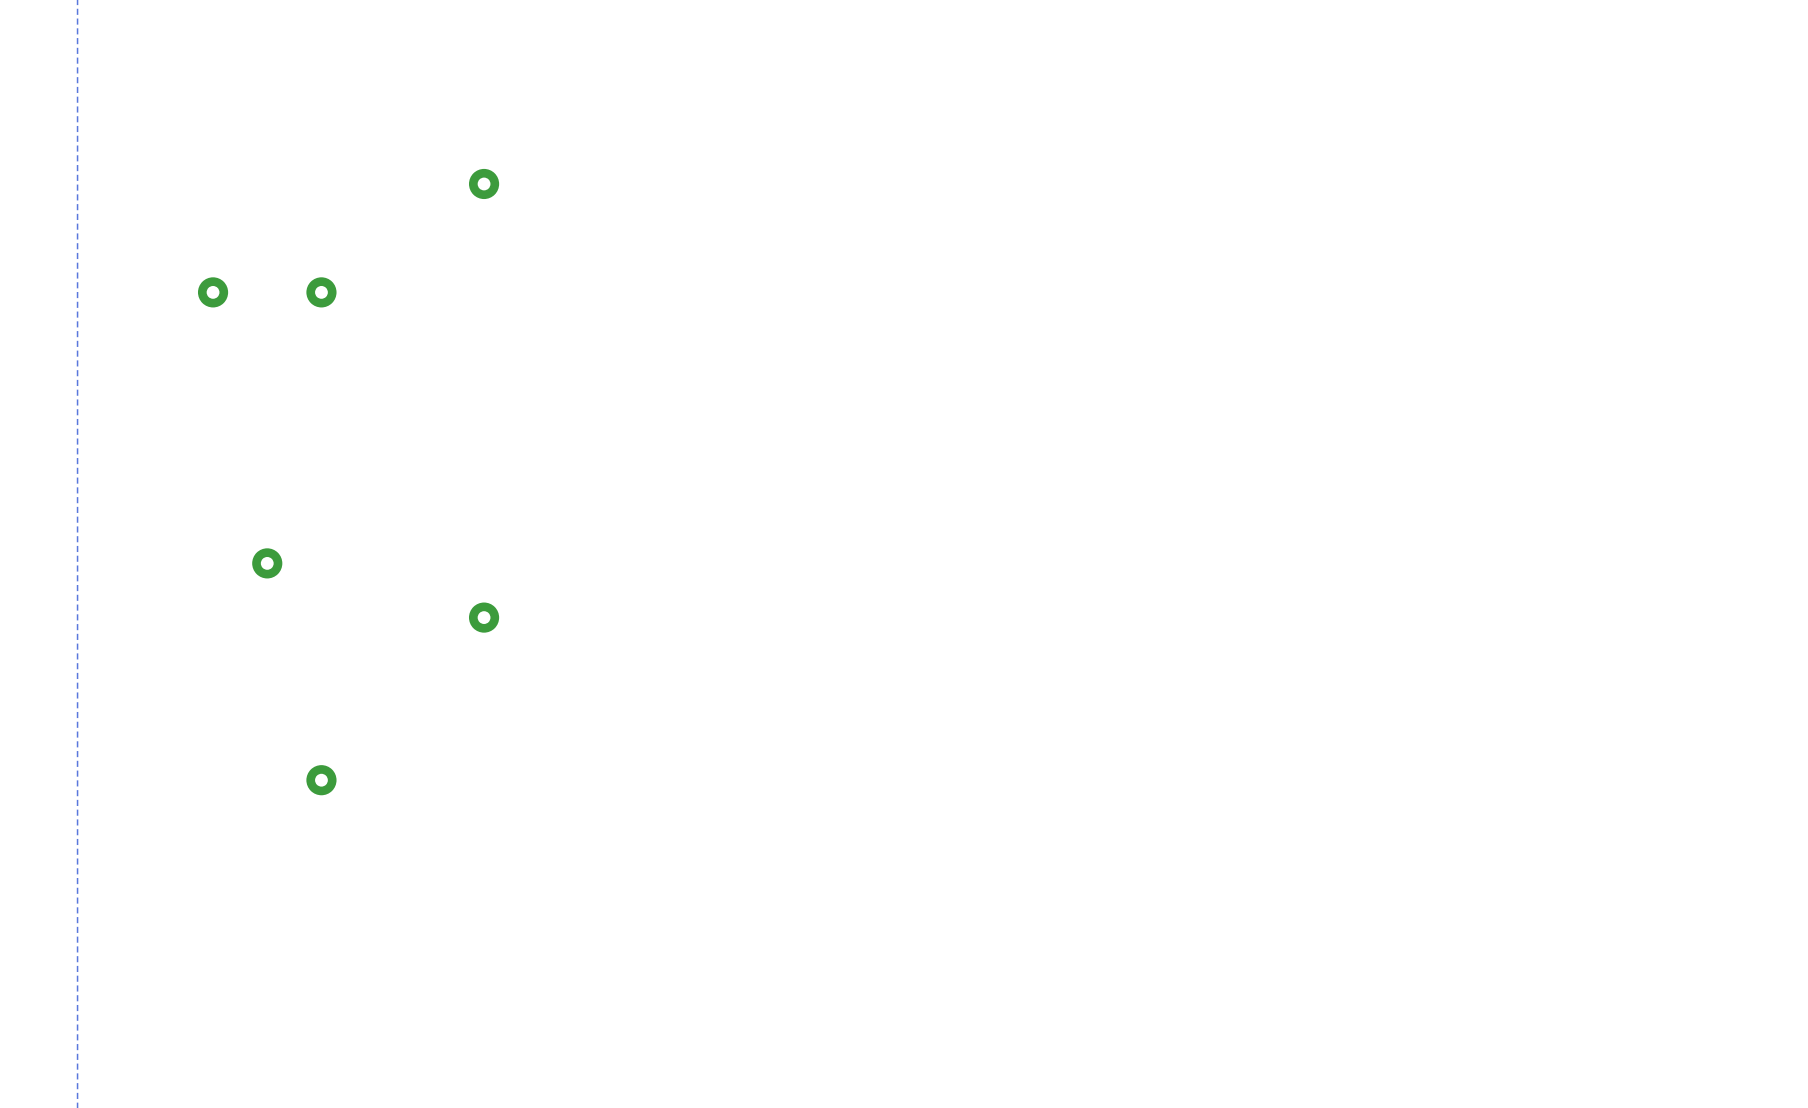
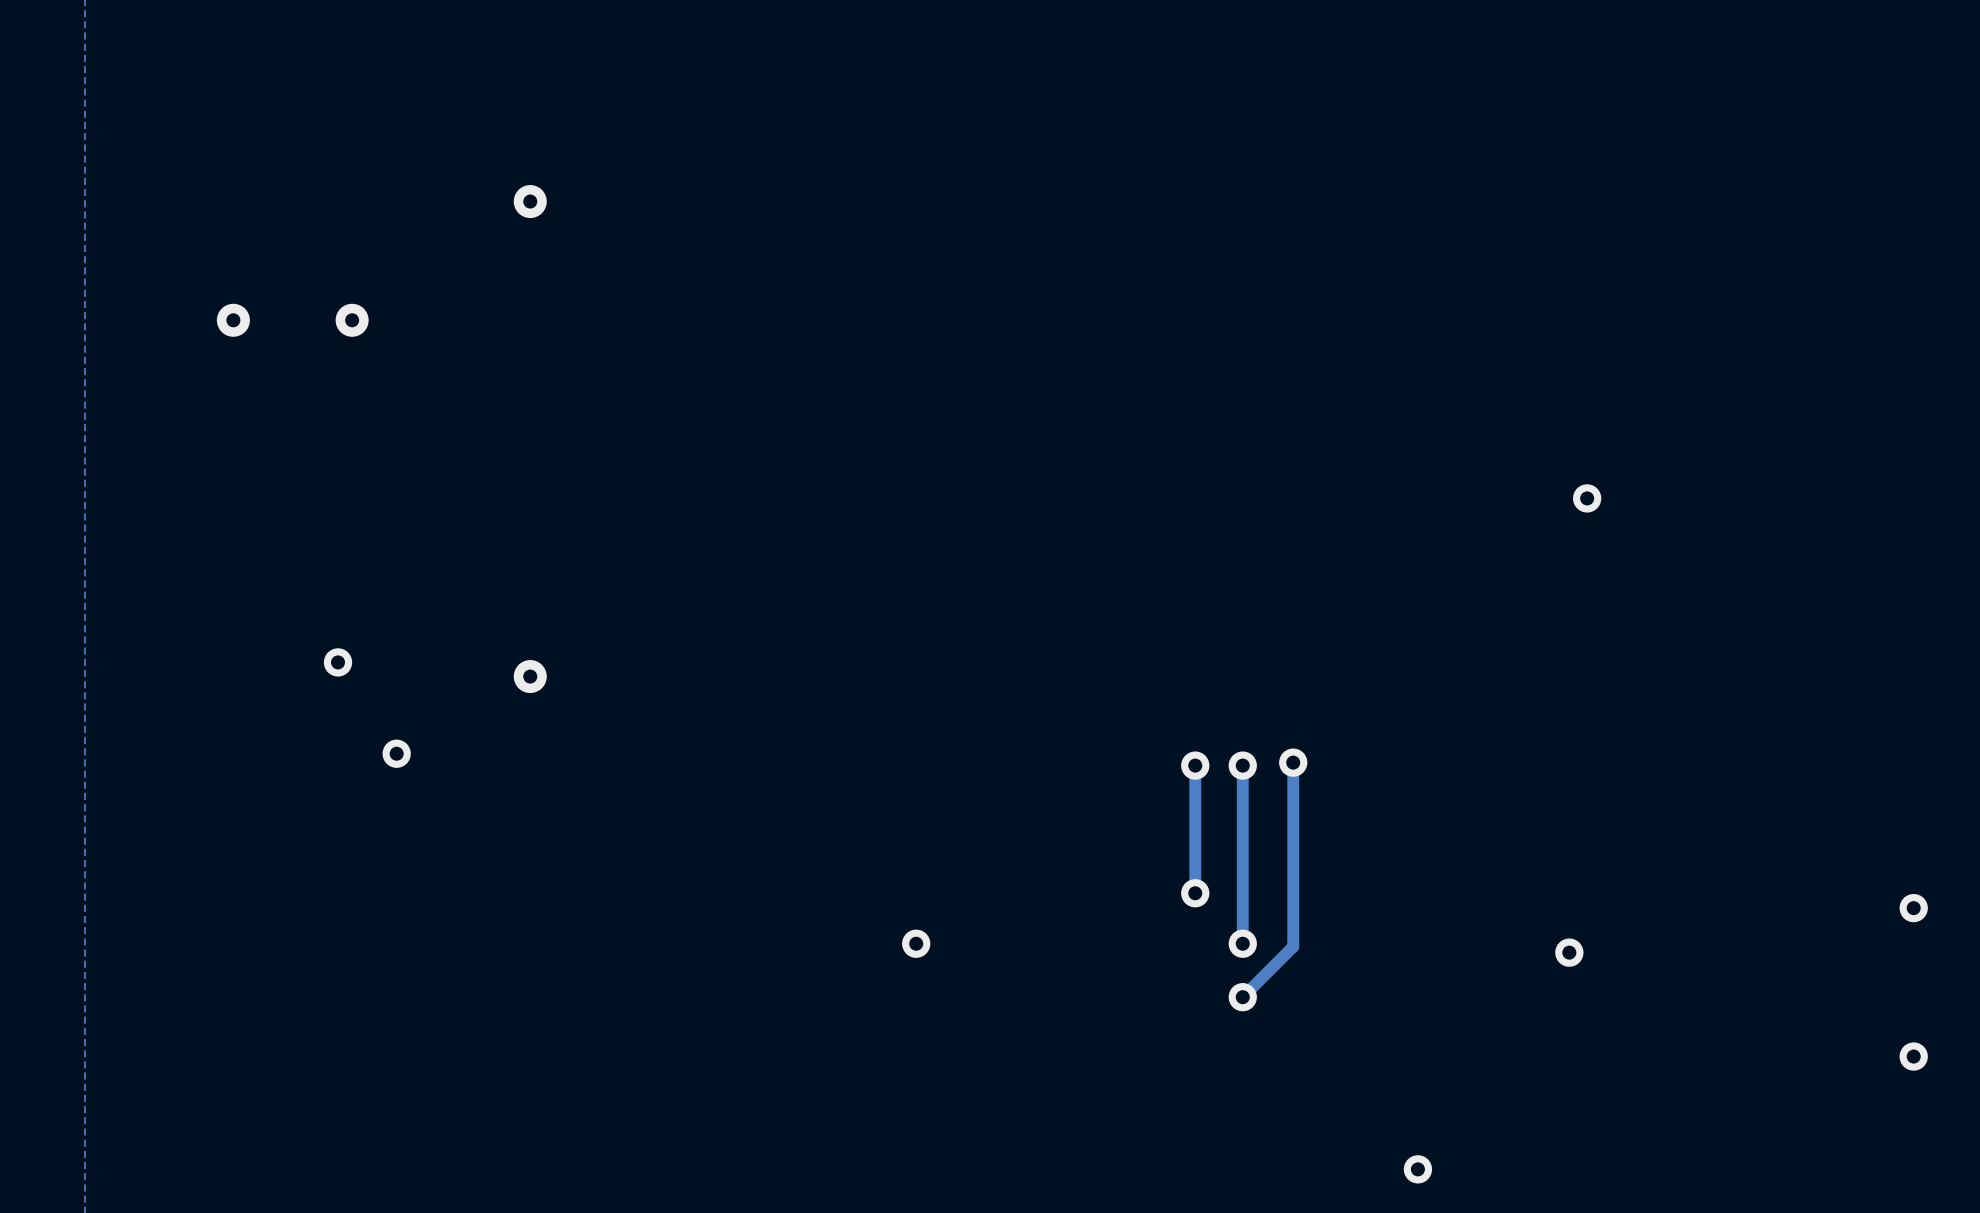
via: none -> (1587, 498)
via: (267, 563) -> none
via: none -> (338, 662)
via: none -> (396, 753)
track: none -> (1293, 762) (1293, 946) (1242, 997)
via: none -> (1293, 762)
track: none -> (1195, 765) (1195, 893)
via: none -> (1195, 765)
track: none -> (1242, 765) (1242, 943)
via: none -> (1242, 765)
via: (321, 780) -> none
via: none -> (1195, 893)
via: none -> (1913, 908)
via: none -> (916, 943)
via: none -> (1242, 943)
via: none -> (1569, 952)
via: none -> (1242, 997)
via: none -> (1913, 1056)
via: none -> (1417, 1169)

